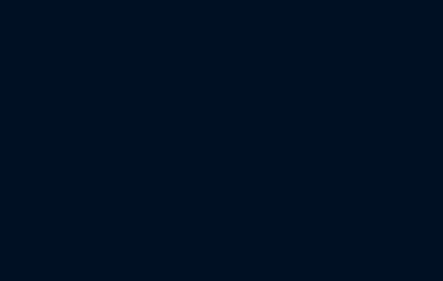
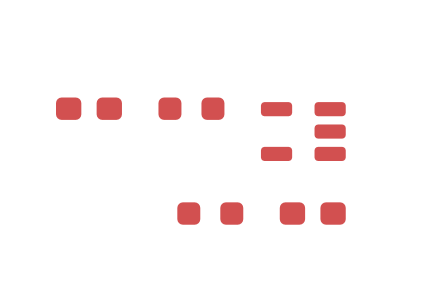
part: none -> (88, 108)
part: none -> (191, 108)
part: none -> (303, 131)
part: none -> (210, 213)
part: none -> (312, 213)

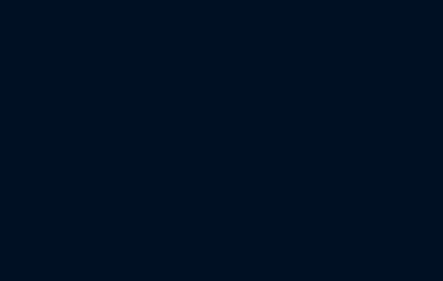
part: (88, 108) -> none
part: (191, 108) -> none
part: (303, 131) -> none
part: (210, 213) -> none
part: (312, 213) -> none

